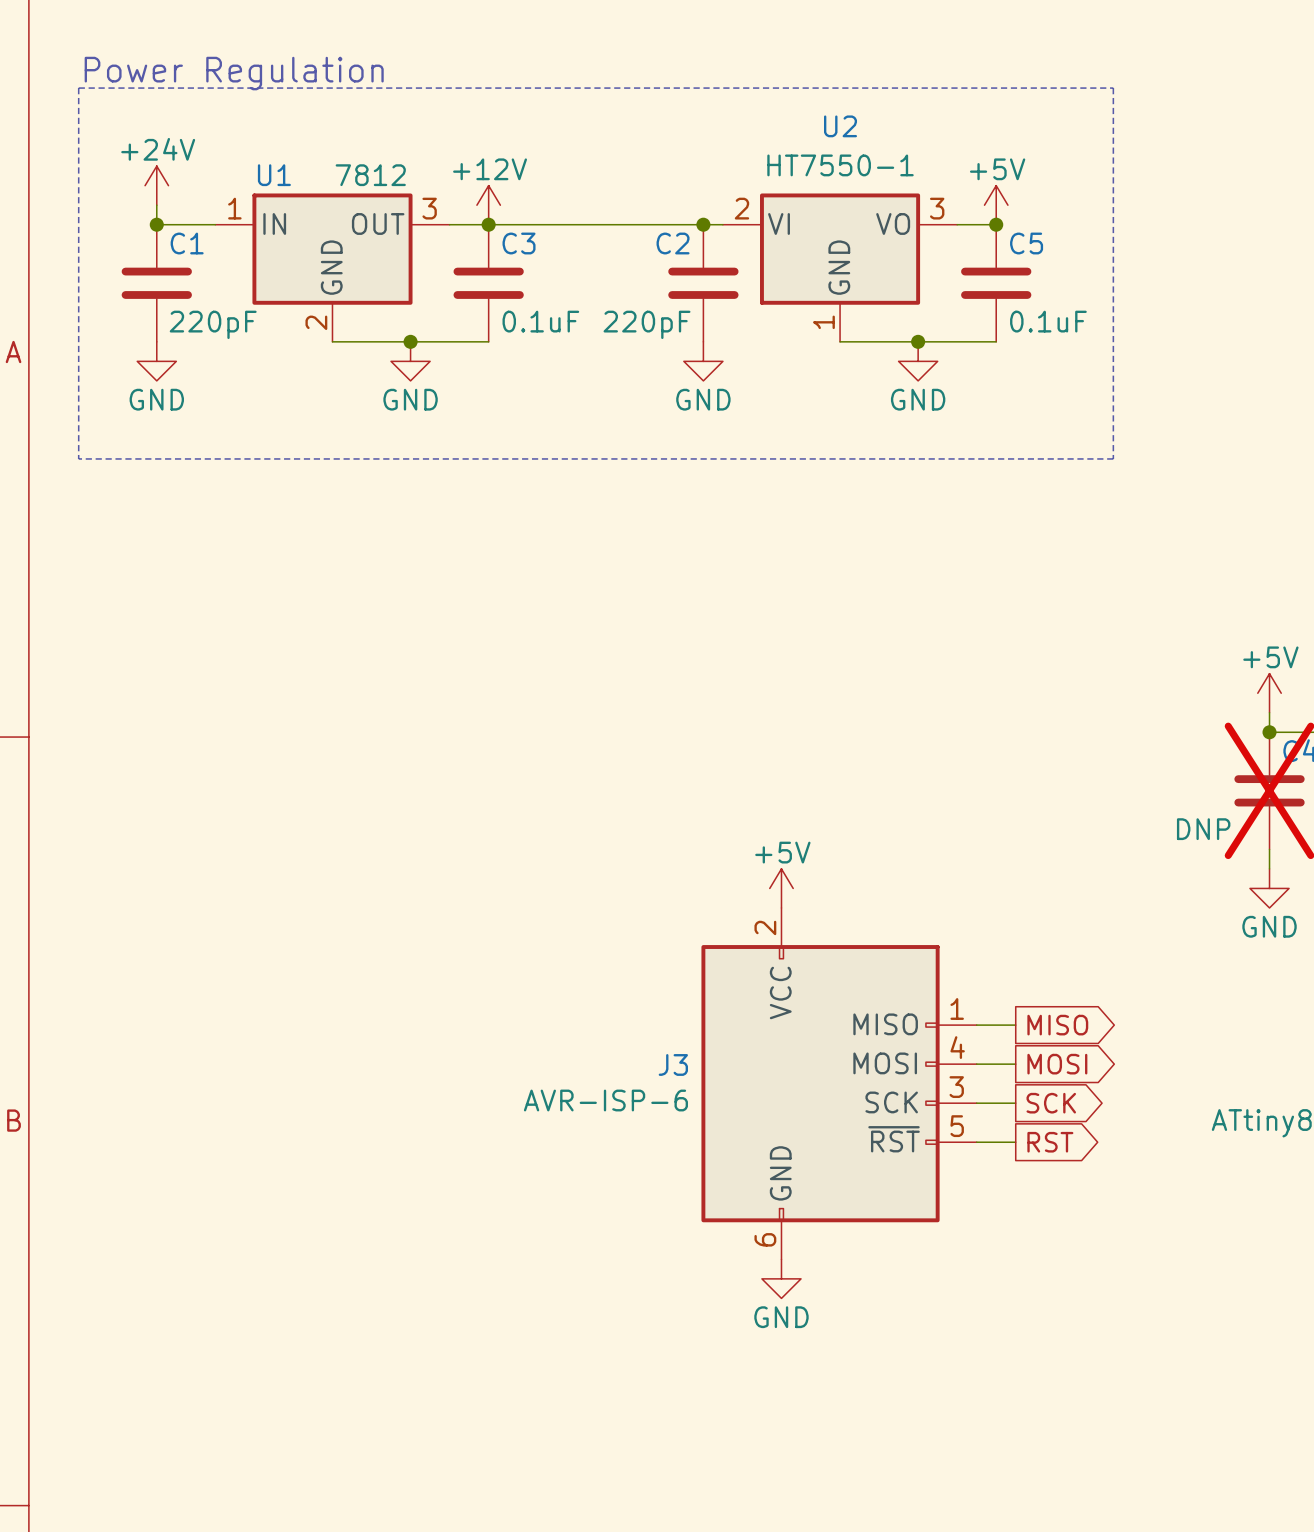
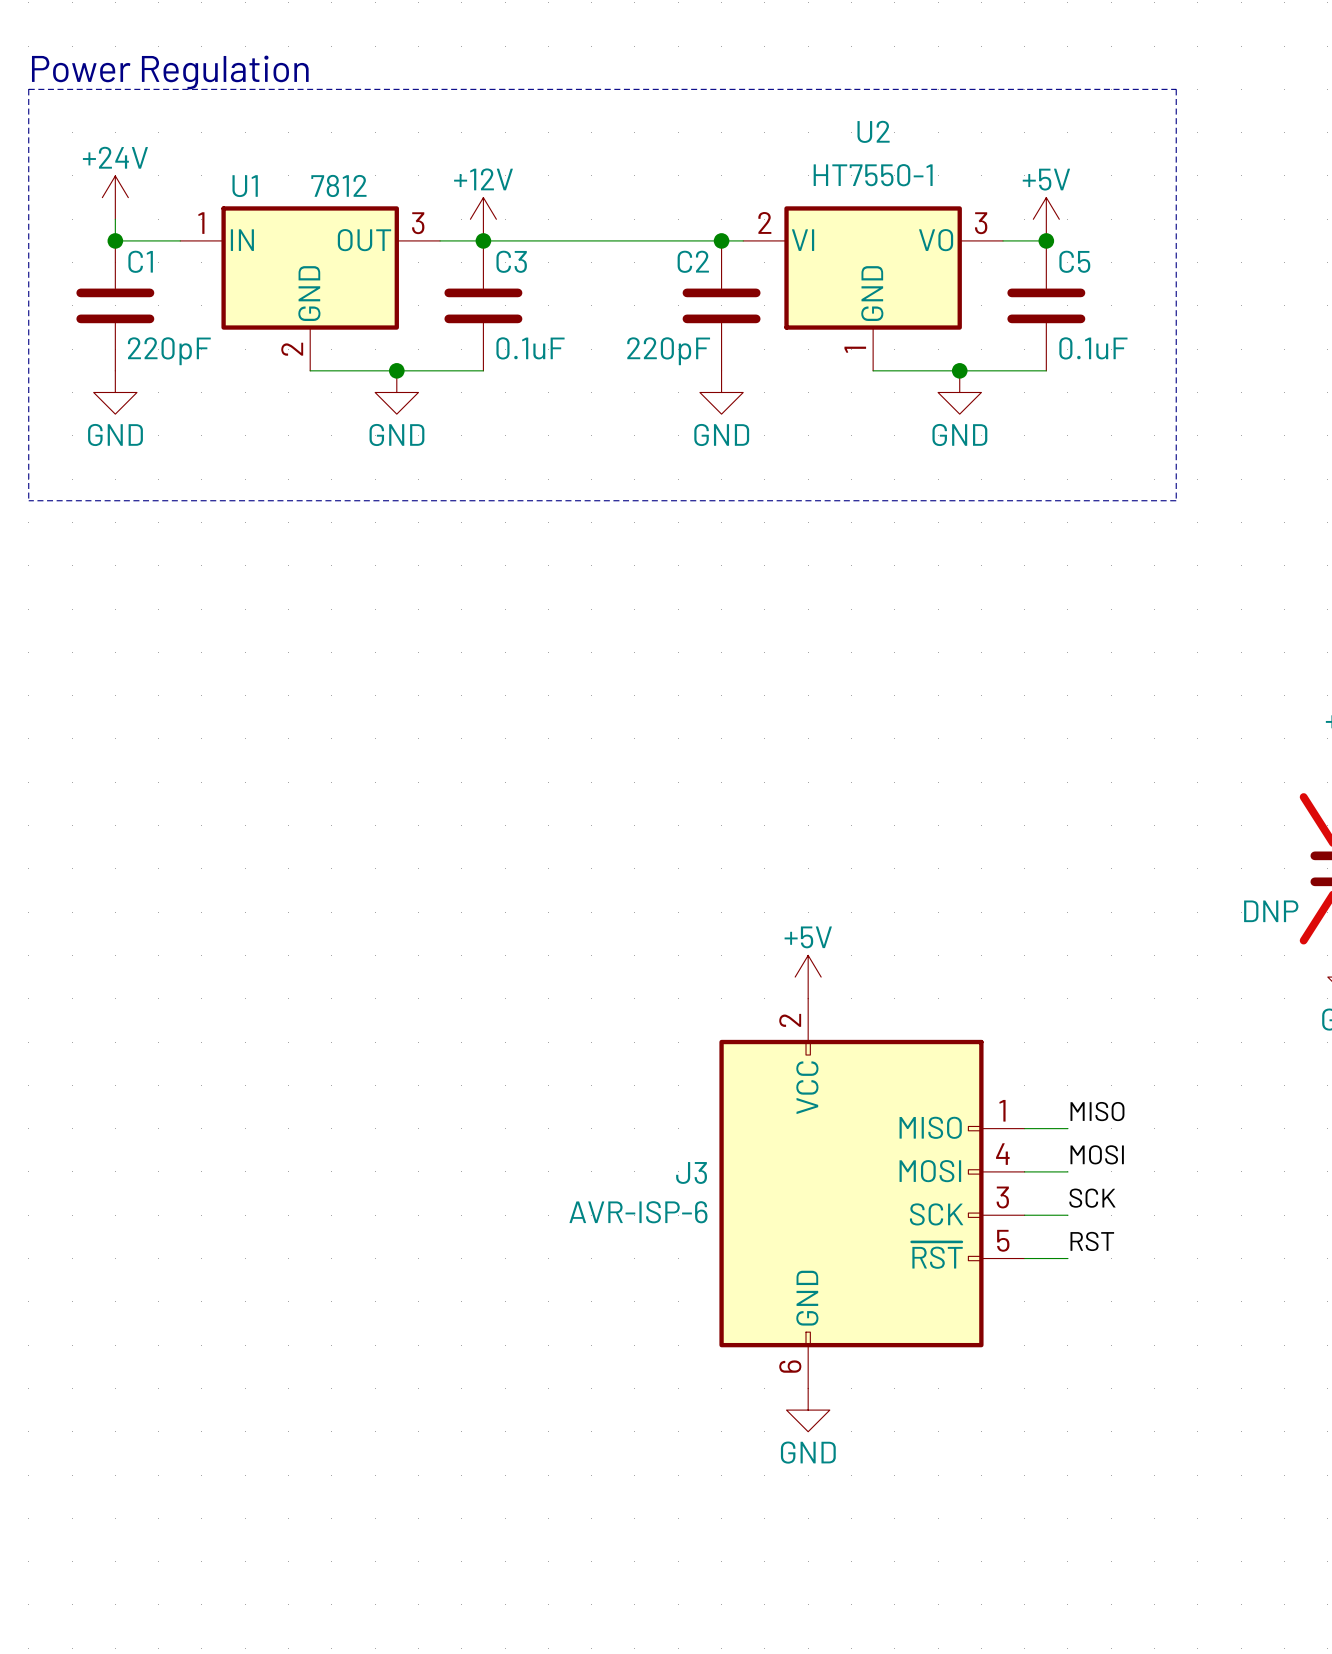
label: none -> MISO (1097, 1111)
global label: MISO (1057, 1025) -> none
label: none -> MOSI (1097, 1154)
global label: MOSI (1057, 1064) -> none
label: none -> SCK (1092, 1198)
global label: SCK (1051, 1103) -> none
label: none -> RST (1092, 1241)
global label: RST (1050, 1142) -> none

